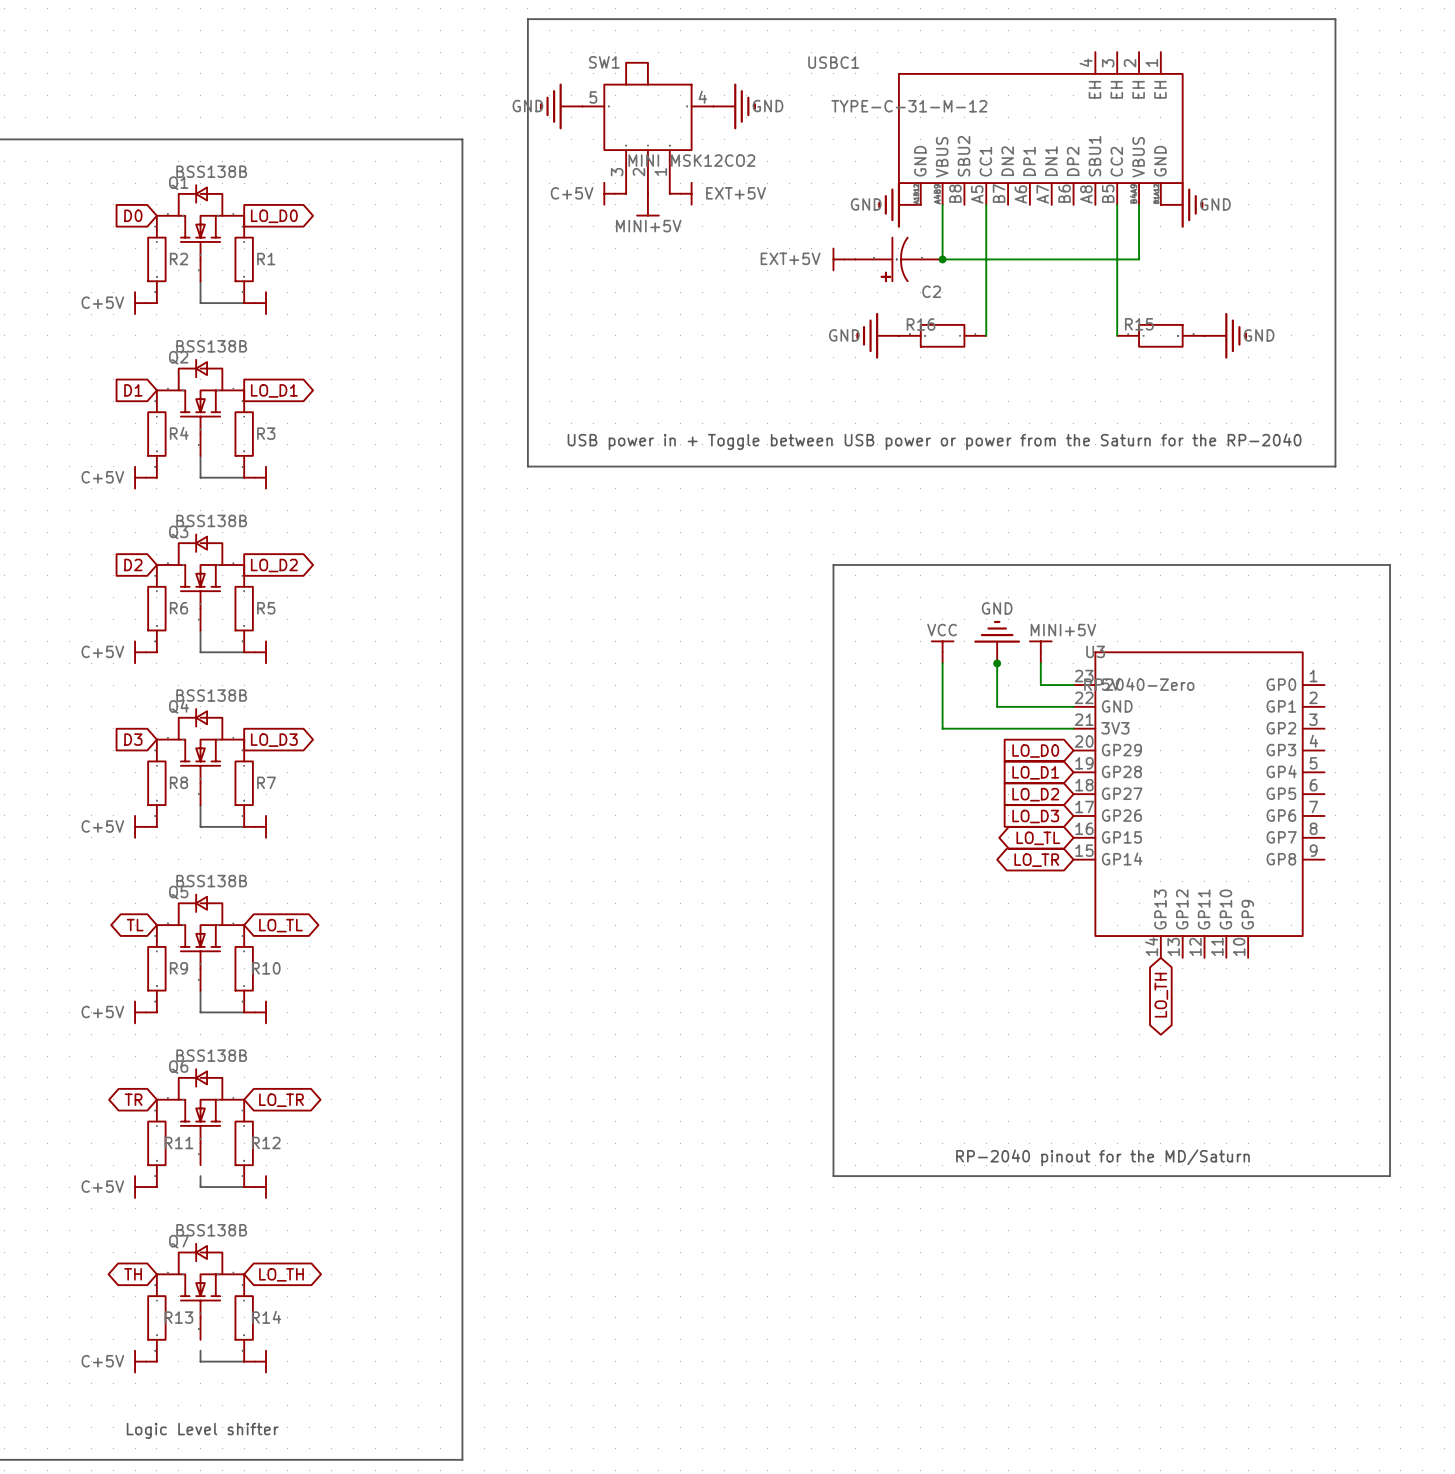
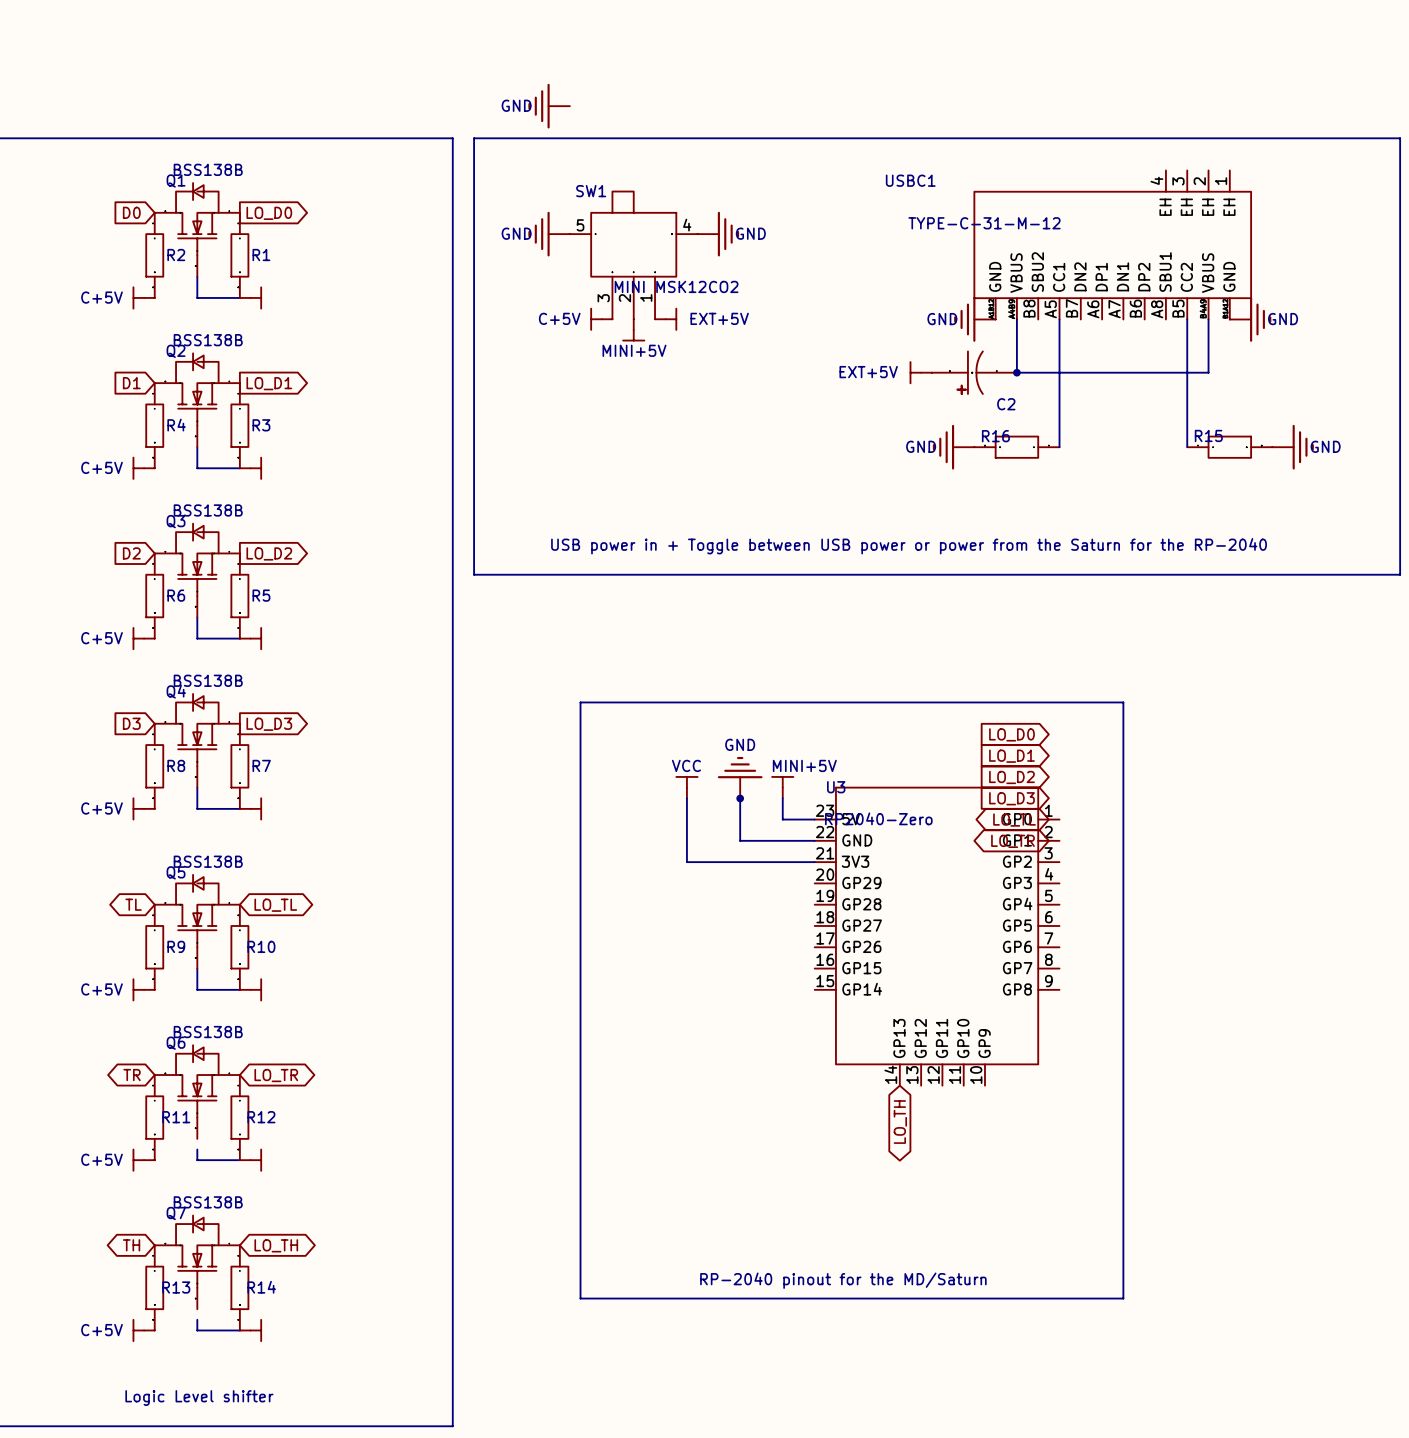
line: (527, 19) (1335, 19) (1335, 466) (527, 466) (527, 19) -> (474, 138) (474, 574) (1400, 574) (1400, 138) (474, 138)
power symbol: GND (734, 106) -> none
SW1 position: (647, 128) -> (633, 255)
USBC1 position: (1040, 128) -> (1112, 244)
power symbol position: C+5V (615, 193) -> C+5V (601, 319)
power symbol: EXT+5V (680, 193) -> none
power symbol position: MINI+5V (647, 204) -> MINI+5V (633, 329)
power symbol: GND (899, 204) -> none
wire: (942, 204) (942, 259) (1139, 259) (1139, 204) -> (1016, 319) (1016, 372) (1208, 372) (1208, 319)
wire: (986, 204) (986, 335) -> (1059, 319) (1059, 447)
wire: (1117, 204) (1117, 335) -> (1187, 319) (1187, 446)
power symbol: GND (1182, 204) -> none
power symbol: none -> GND (549, 234)
power symbol: none -> GND (718, 234)
power symbol: EXT+5V (844, 259) -> none
C2 position: (898, 259) -> (974, 372)
junction: (942, 259) -> none
power symbol: none -> EXT+5V (665, 319)
power symbol: none -> GND (974, 319)
power symbol: GND (877, 335) -> none
R16 position: (942, 335) -> (1016, 447)
R15 position: (1160, 335) -> (1229, 447)
power symbol position: GND (1225, 335) -> GND (1250, 319)
power symbol: none -> EXT+5V (921, 372)
junction: none -> (1016, 372)
text position: USB power in + Toggle between USB power or power from the Saturn for the RP-2040 (934, 441) -> USB power in + Toggle between USB power or power from the Saturn for the RP-2040 (909, 546)
power symbol: none -> GND (953, 447)
power symbol: none -> GND (1293, 447)
line: (833, 564) (1390, 564) (1390, 1176) (833, 1176) (833, 564) -> none
power symbol: GND (997, 642) -> none
power symbol: VCC (942, 652) -> none
power symbol: MINI+5V (1040, 652) -> none
wire: (942, 663) (942, 728) (1073, 728) -> none
wire: (997, 663) (997, 706) (1073, 706) -> none
junction: (997, 663) -> none
wire: (1040, 663) (1040, 685) (1073, 685) -> none
line: none -> (580, 702) (1123, 702) (1123, 1298) (580, 1298) (580, 702)
power symbol: none -> GND (740, 777)
power symbol: none -> VCC (686, 787)
power symbol: none -> MINI+5V (782, 787)
U3 position: (1199, 805) -> (937, 936)
wire: none -> (686, 798) (686, 862) (814, 862)
wire: none -> (740, 798) (740, 840) (814, 840)
wire: none -> (782, 798) (782, 819) (814, 819)
junction: none -> (740, 798)
global label: LO_TH (1161, 995) -> none
global label: none -> LO_TH (900, 1122)
text: RP-2040 pinout for the MD/Saturn (1102, 1157) -> none
text: none -> RP-2040 pinout for the MD/Saturn (843, 1280)

